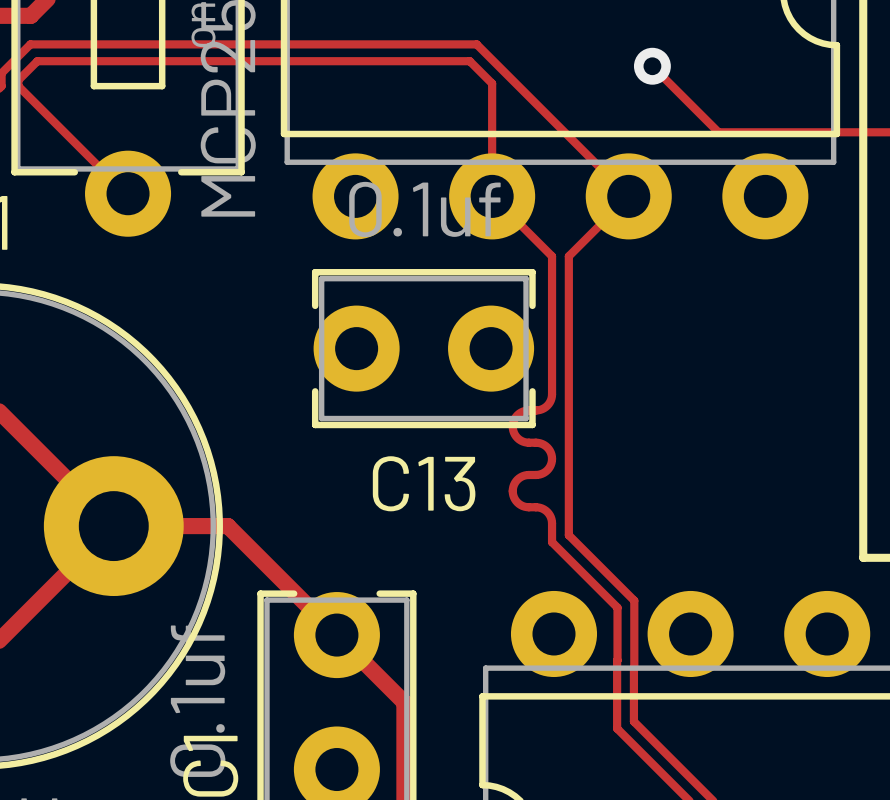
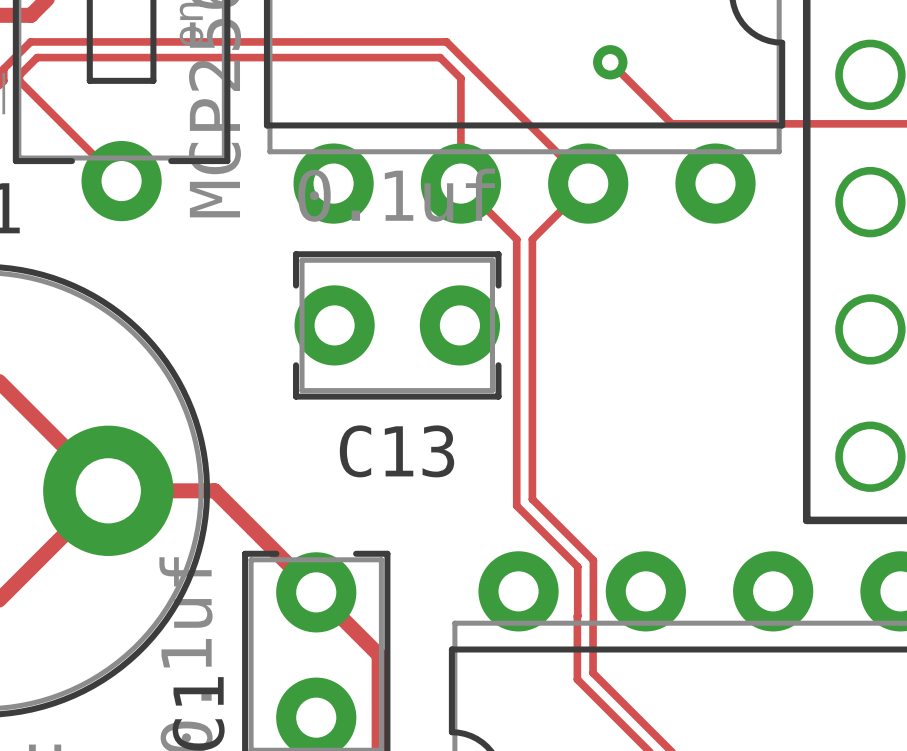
track: (552, 394) (549, 402) (545, 407) (540, 409) (520, 412) (514, 418) (512, 426) (513, 432) (519, 439) (526, 442) (542, 443) (550, 452) (551, 460) (547, 470) (540, 474) (520, 477) (514, 483) (512, 491) (514, 499) (520, 505) (540, 507) (545, 510) (549, 515) (552, 523) -> (516, 368) (516, 488)

